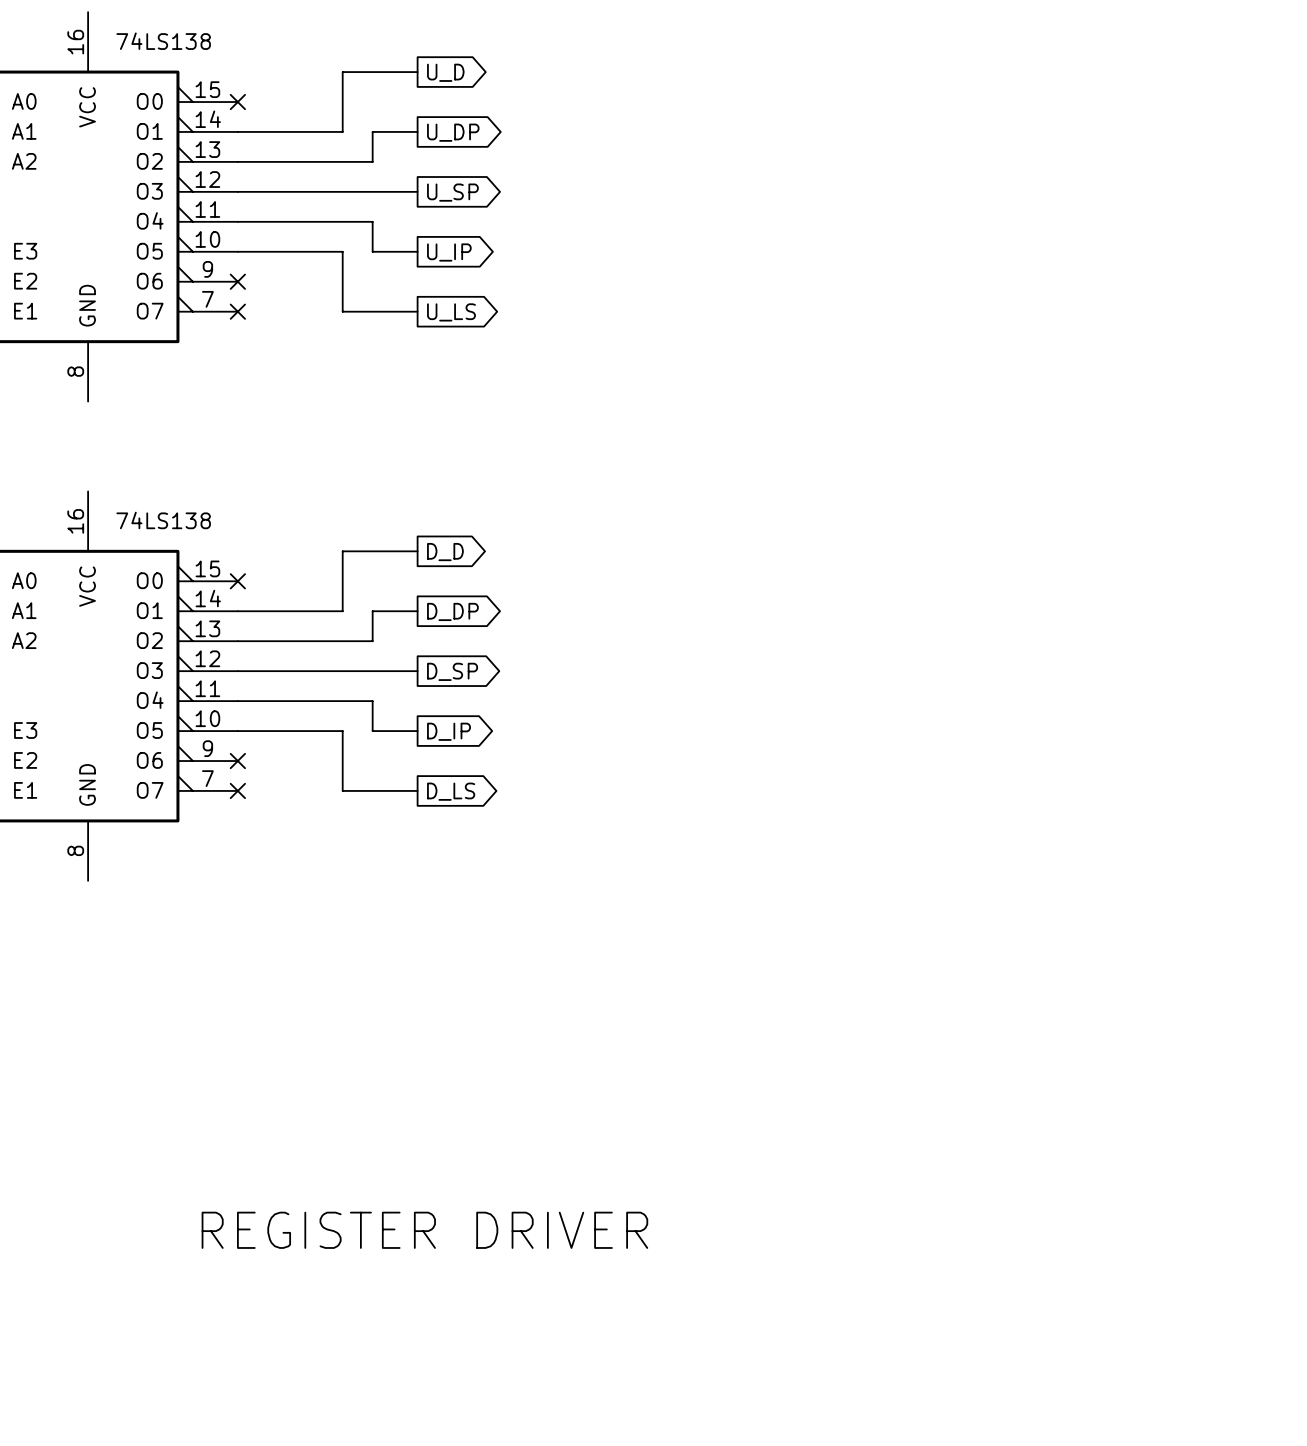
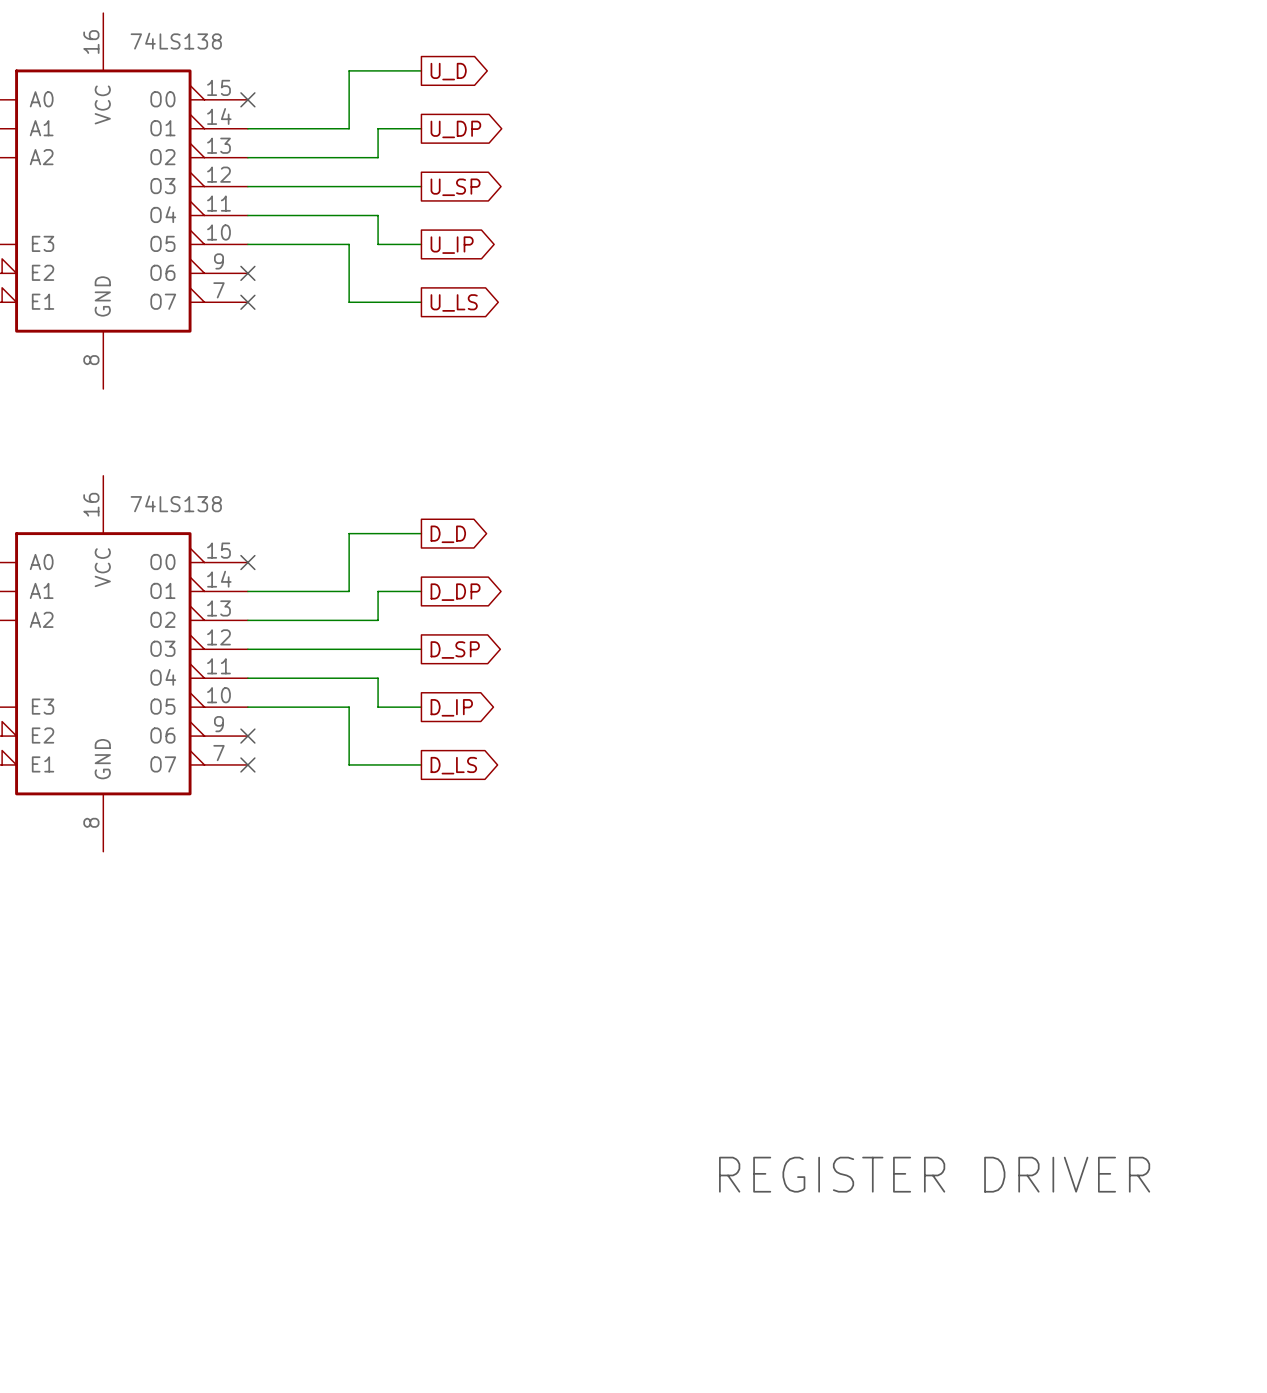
text: none -> REGISTER DRIVER (934, 1174)
text: REGISTER DRIVER (424, 1230) -> none

